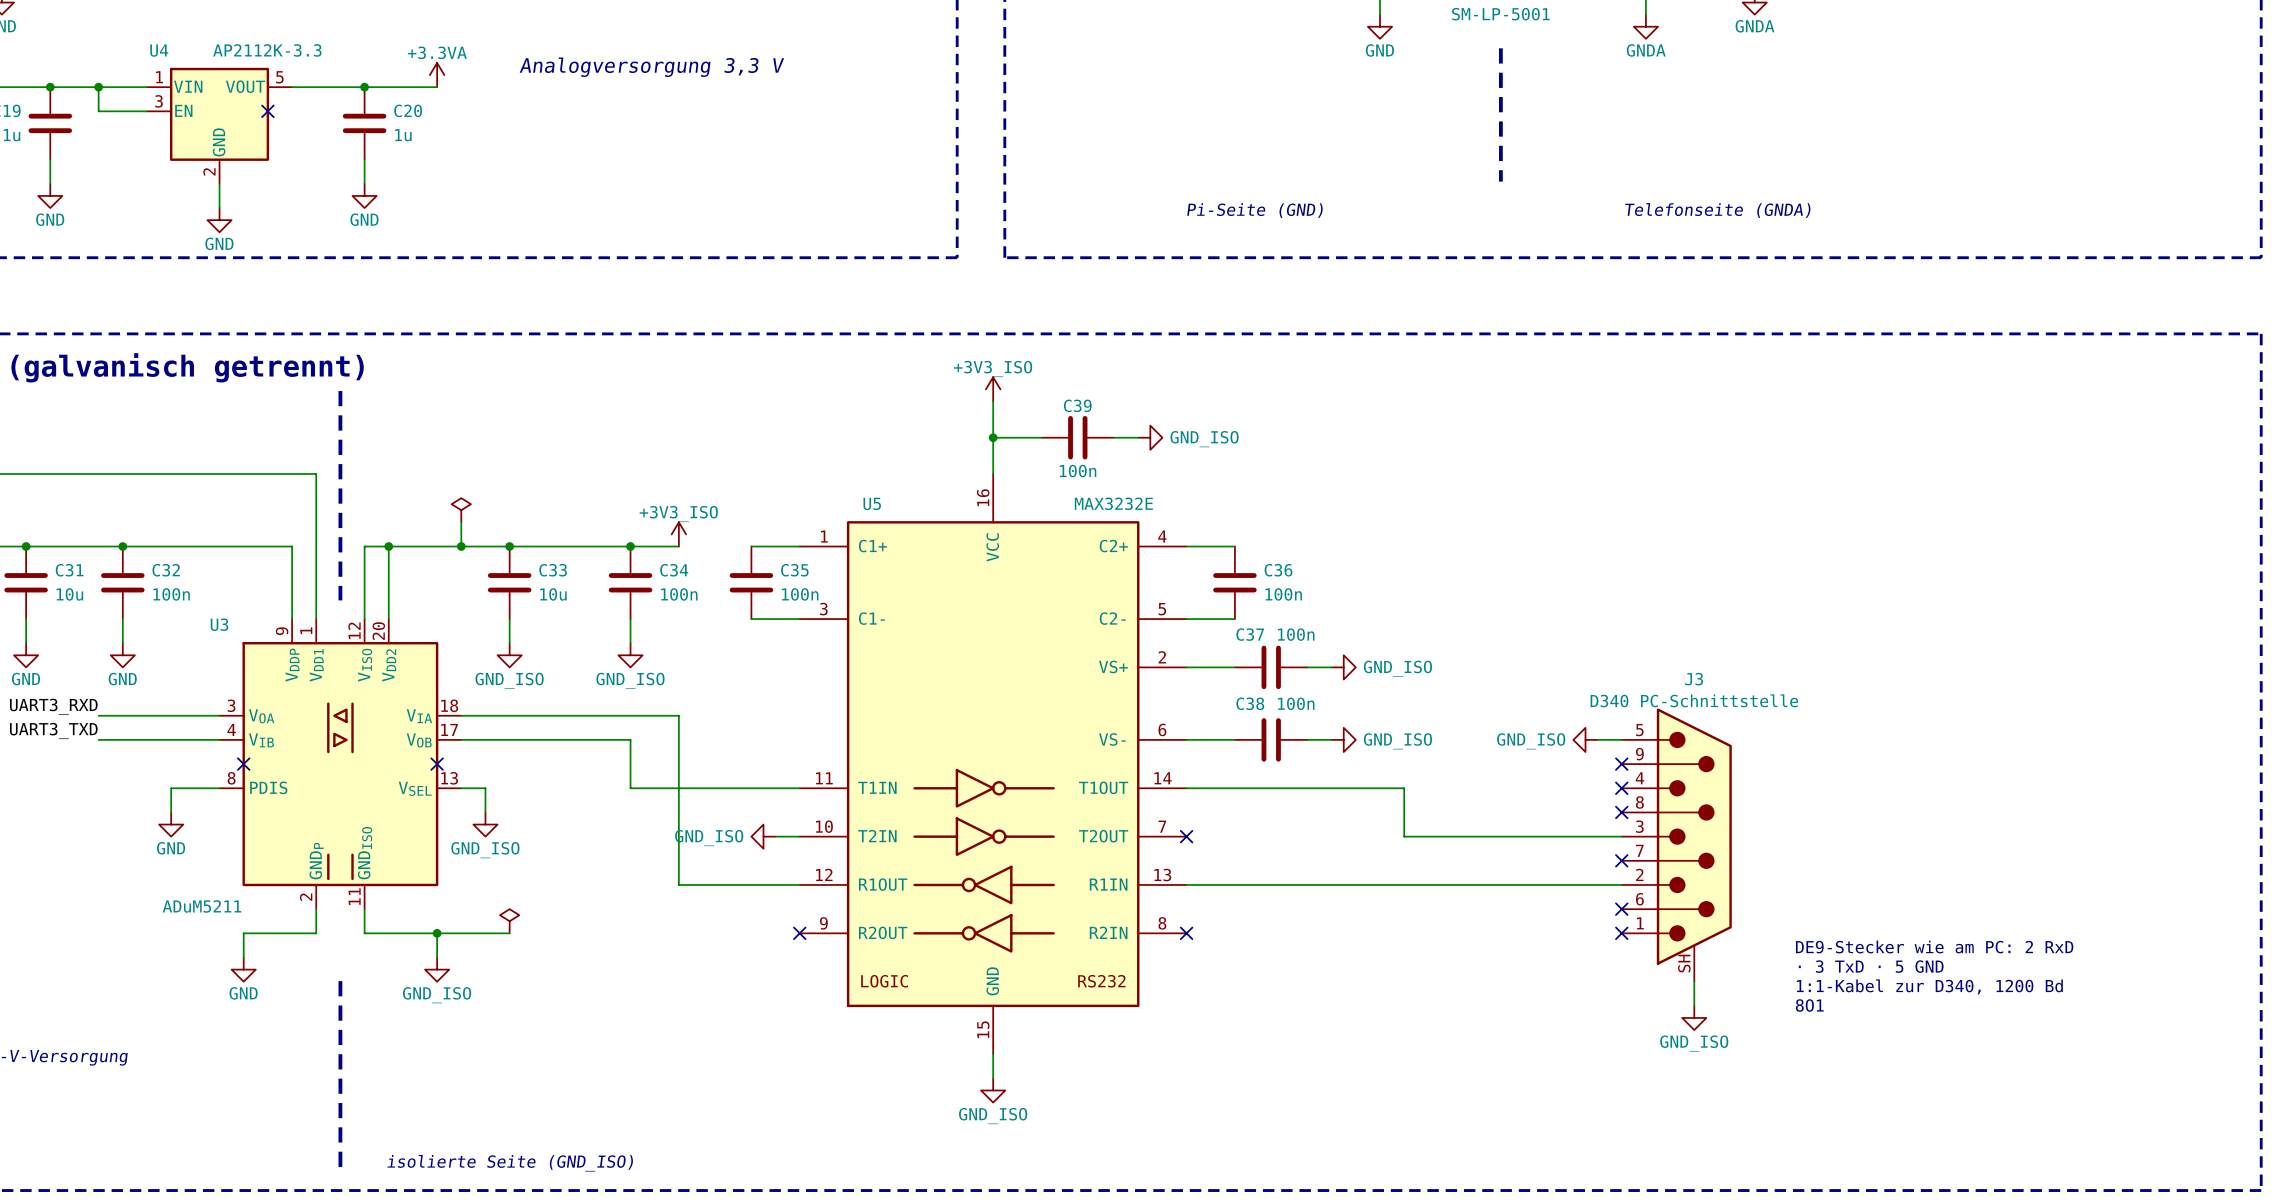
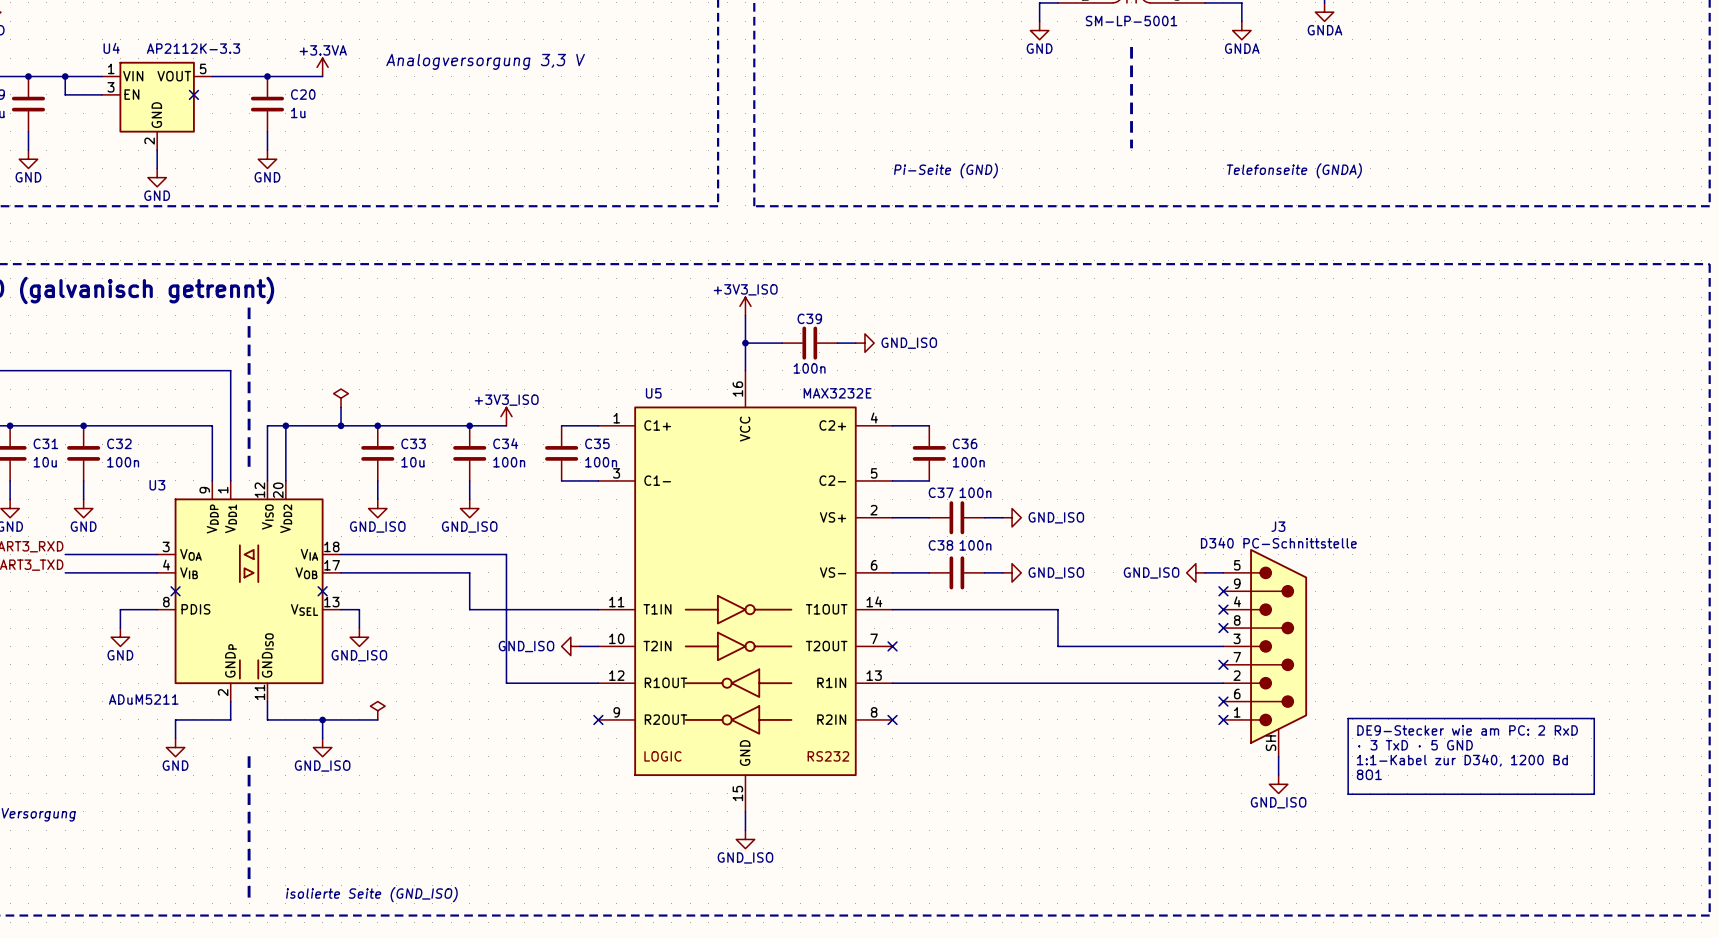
line: none -> (1348, 718) (1594, 718) (1594, 794) (1348, 794) (1348, 718)

